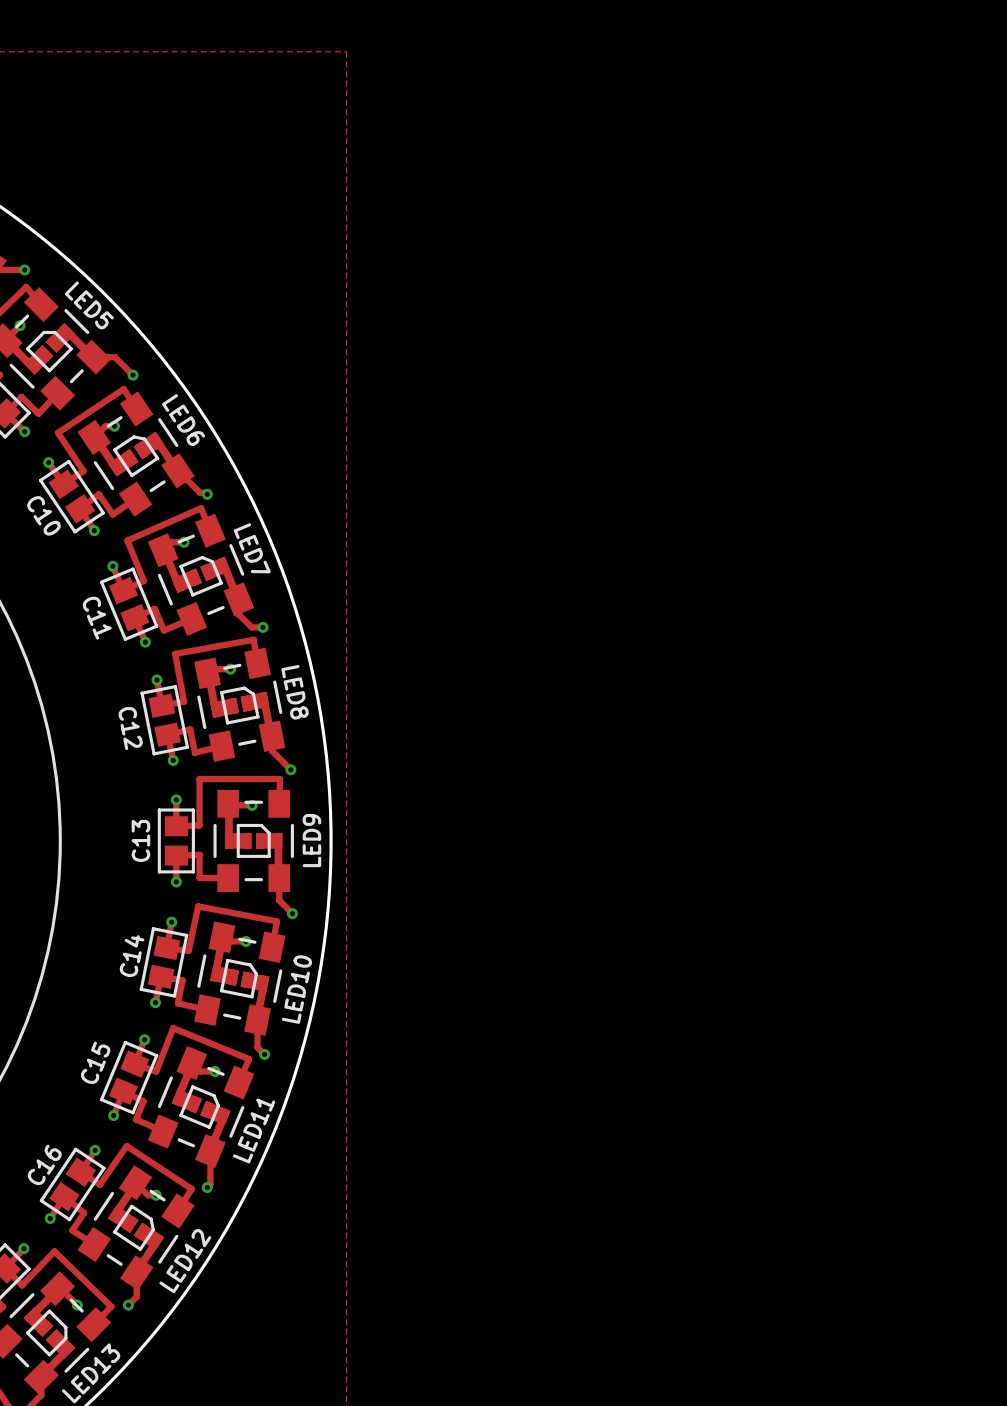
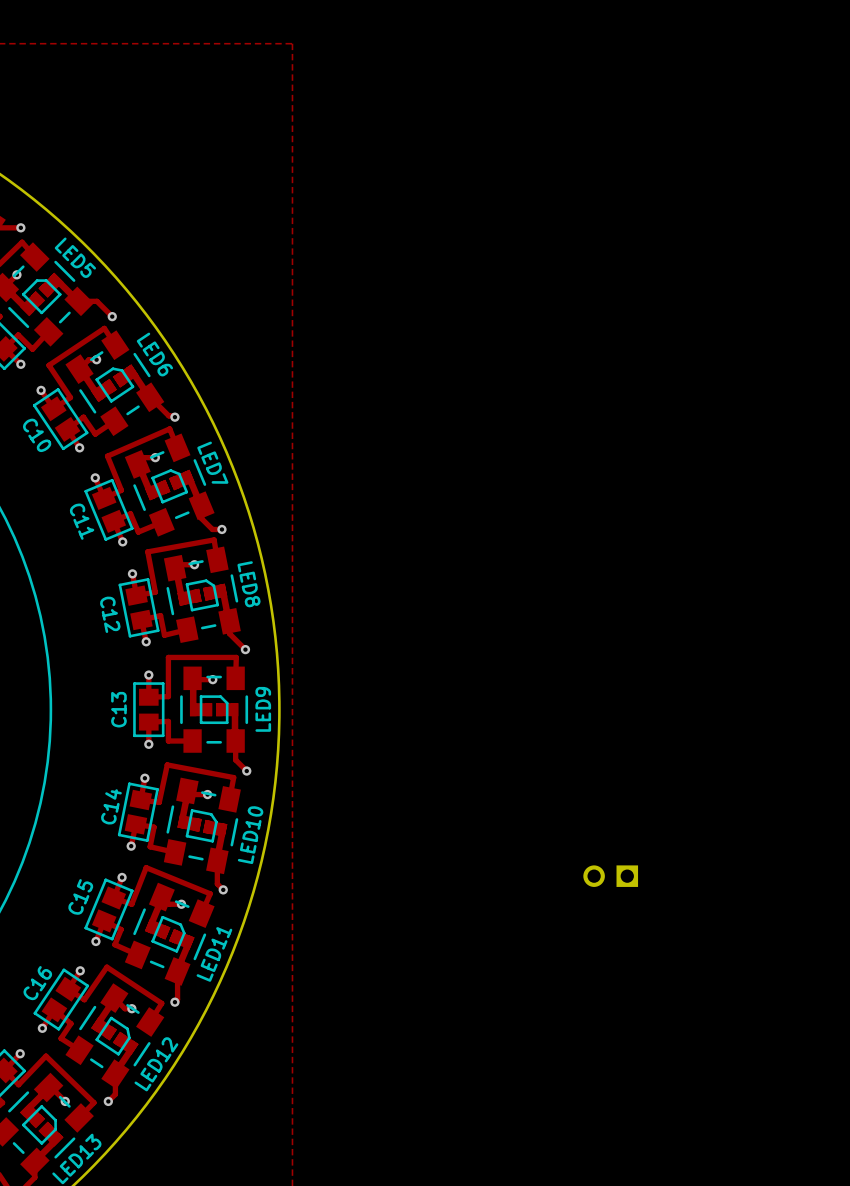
part: none -> (610, 876)

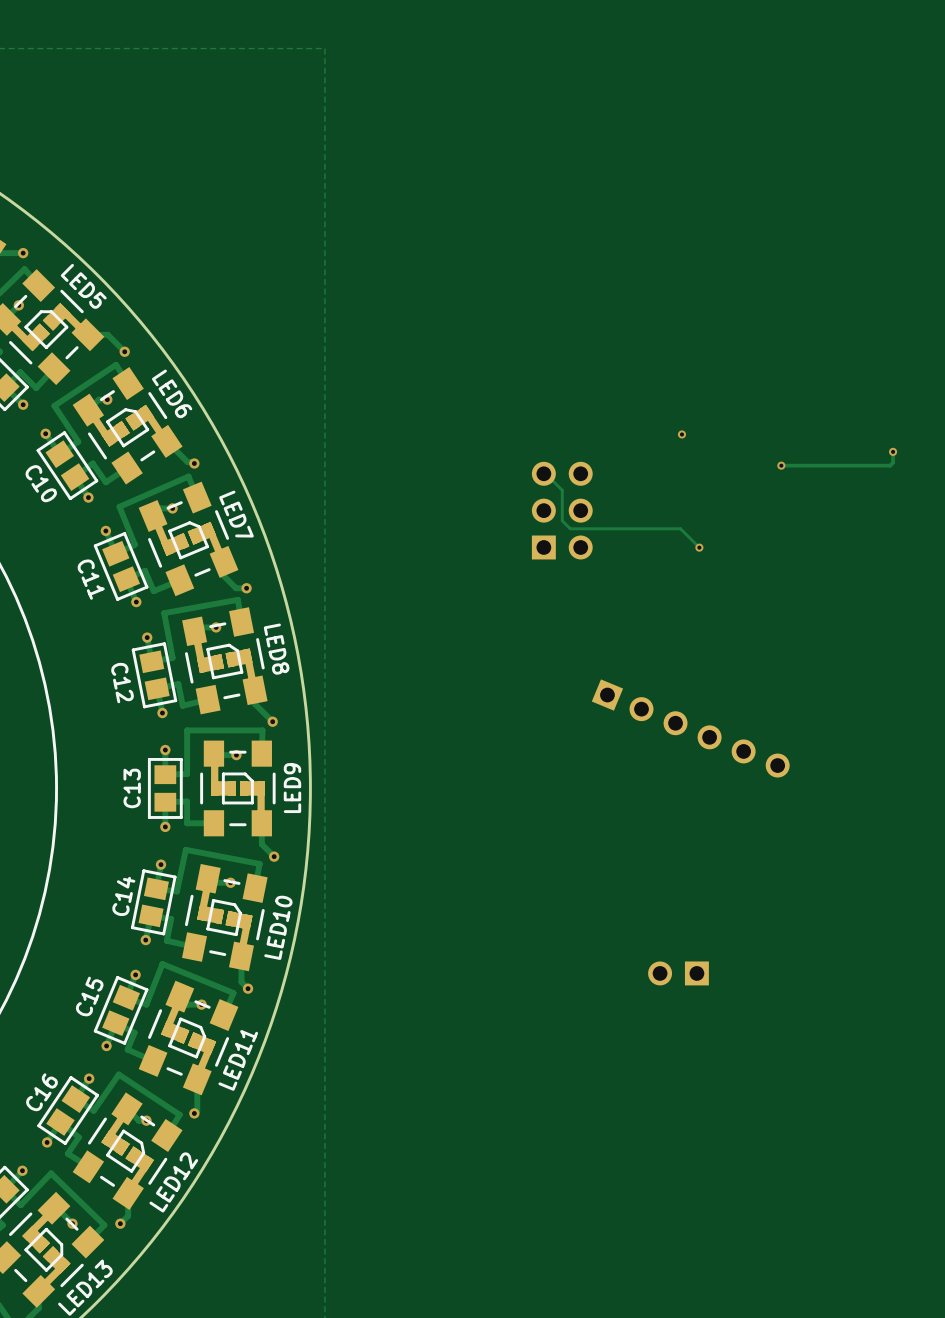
via: none -> (681, 434)
track: none -> (893, 451) (893, 462) (890, 465) (781, 465)
via: none -> (893, 451)
via: none -> (781, 465)
track: none -> (543, 473) (562, 490) (562, 520) (570, 528) (680, 528) (699, 547)
part: none -> (562, 510)
via: none -> (699, 547)
part: none -> (690, 728)

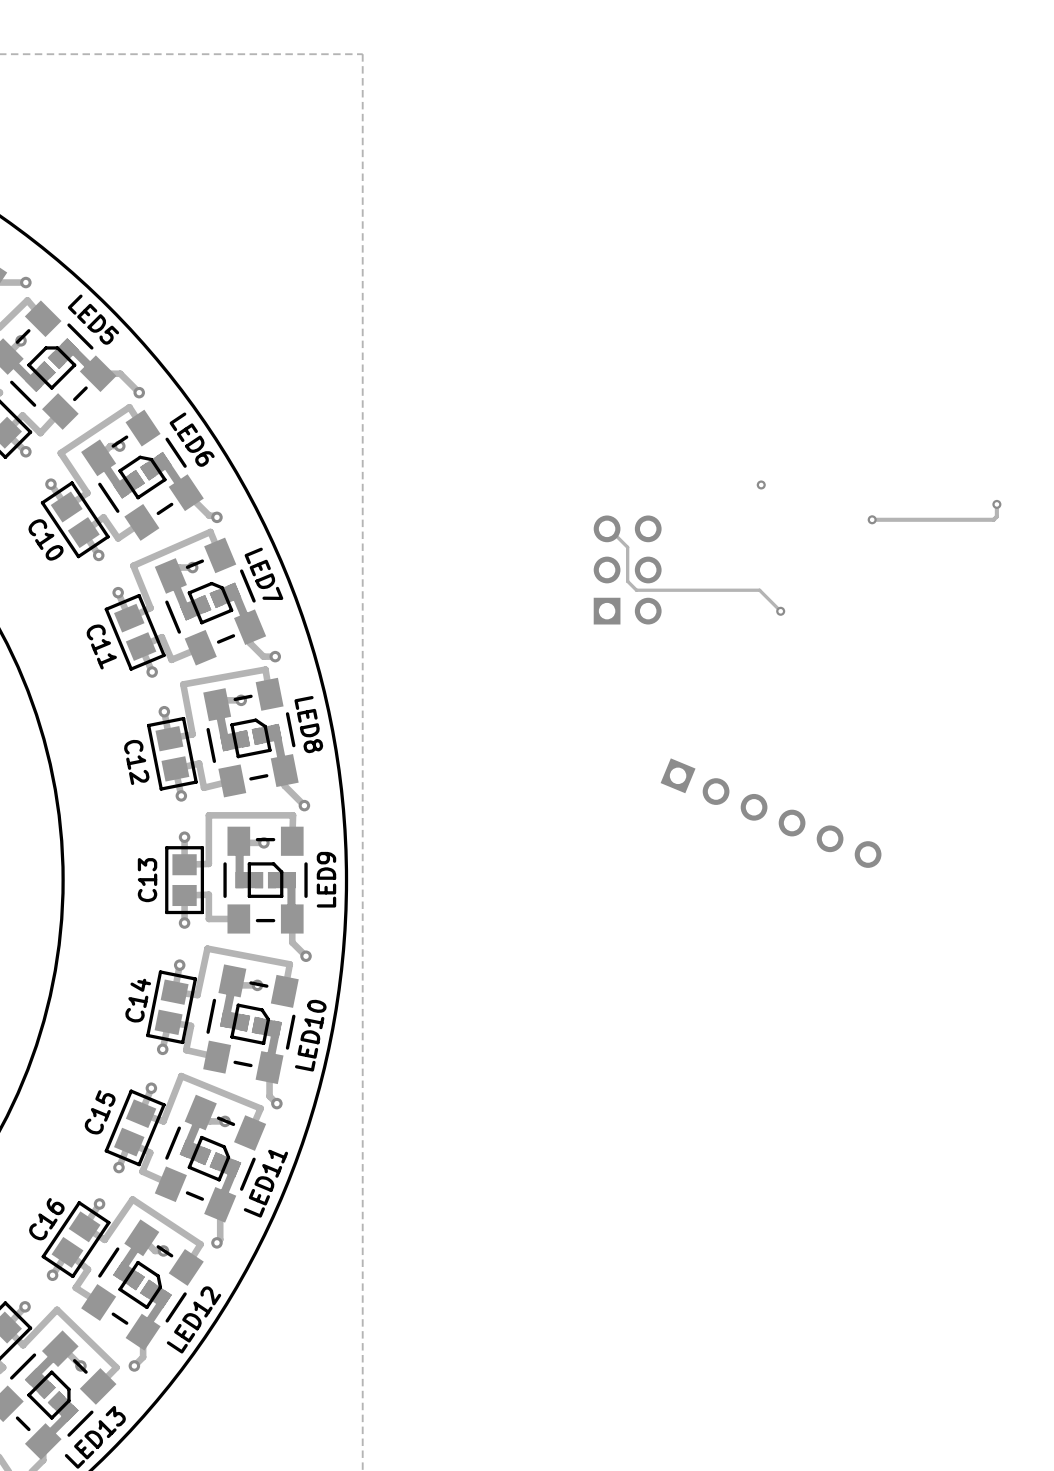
part: (678, 973) -> none

